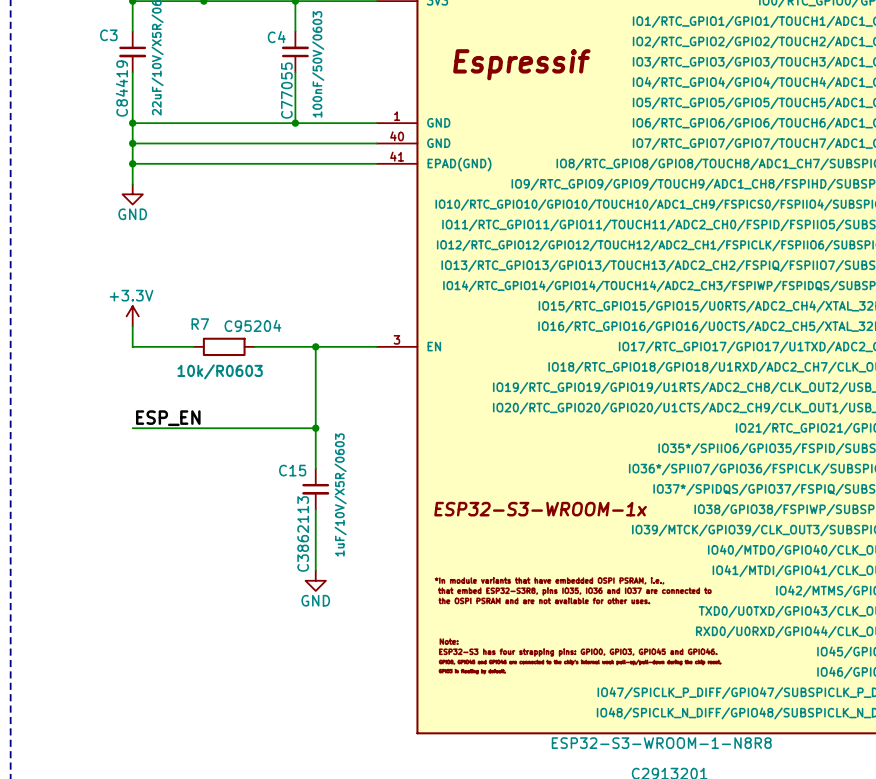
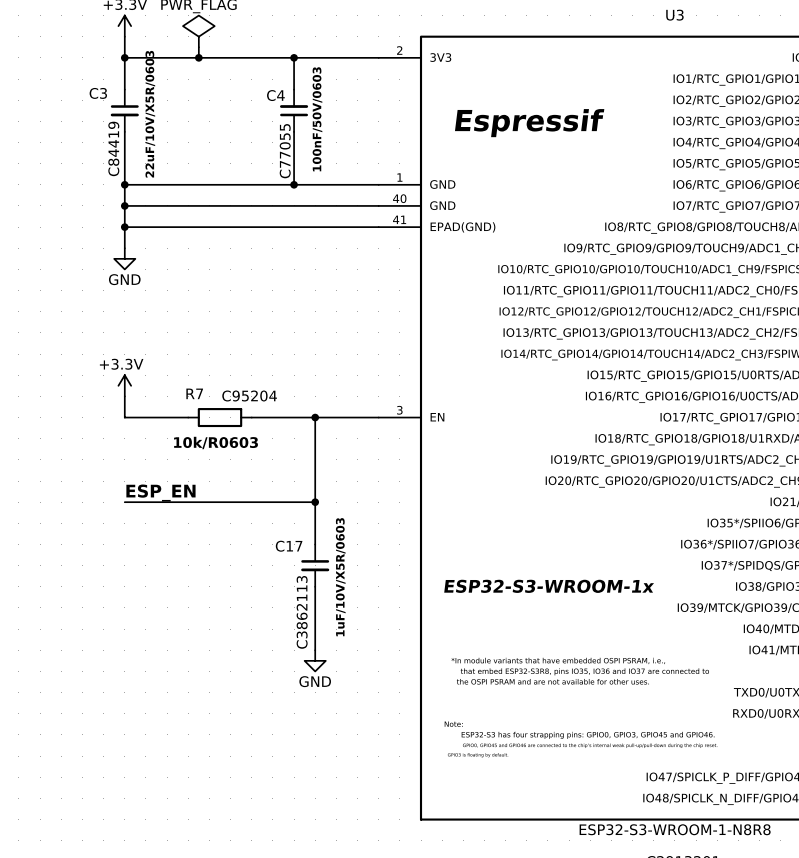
C15 name: C15 (292, 470) -> C17 (289, 546)

